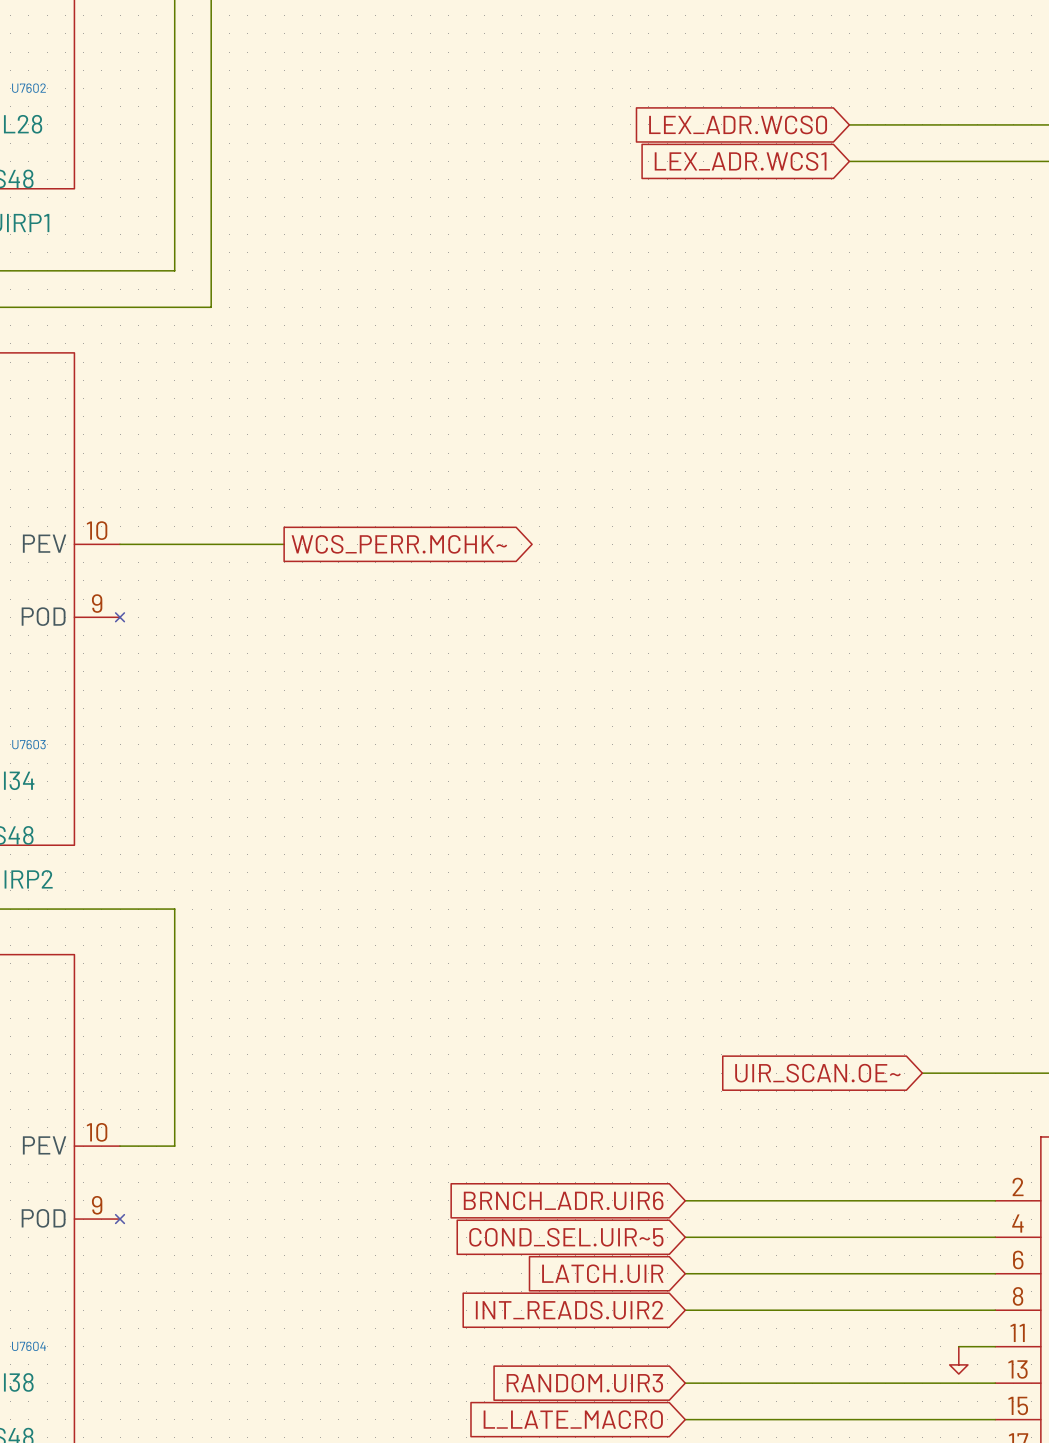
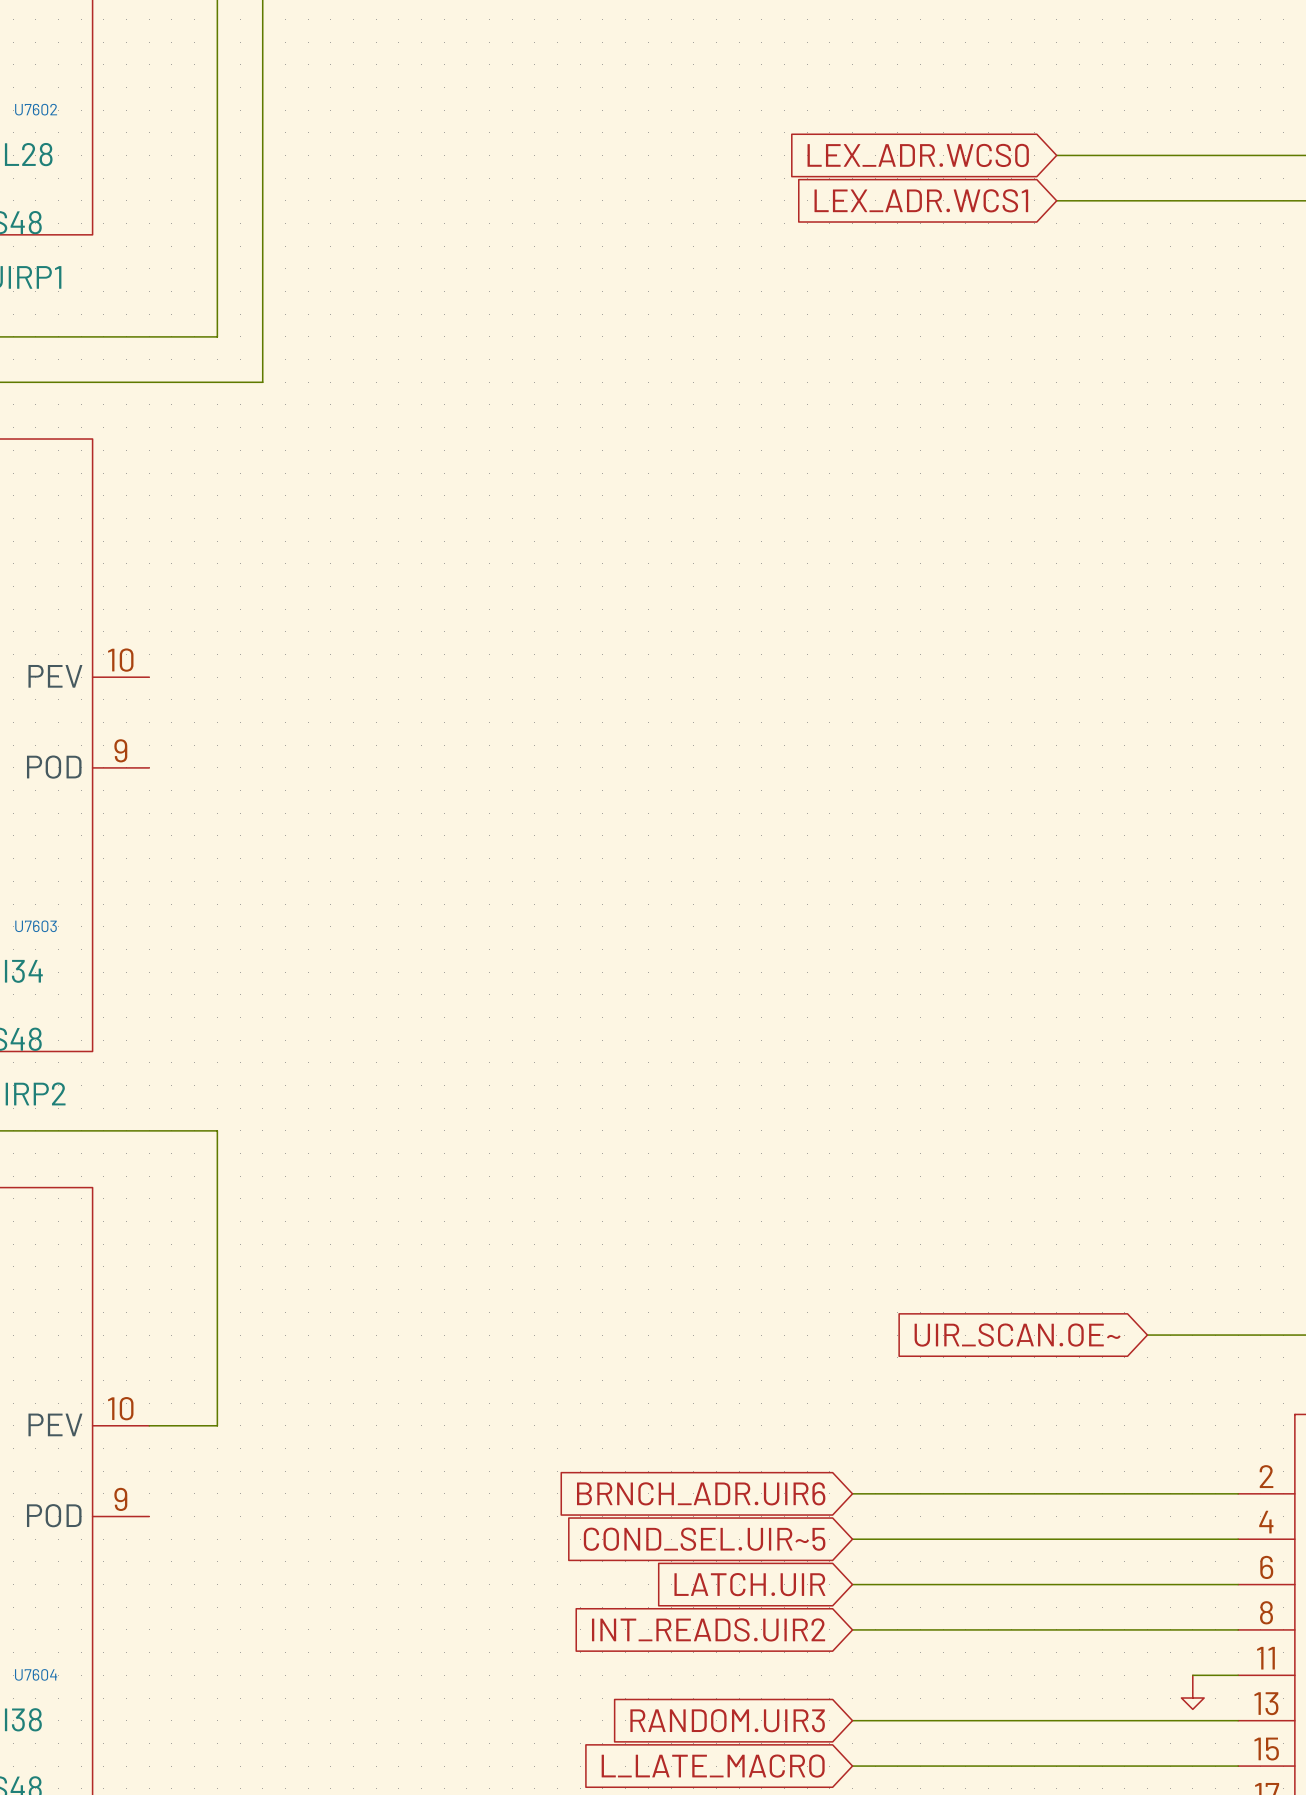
wire: (120, 544) (284, 544) -> none
global label: WCS_PERR.MCHK~ (399, 544) -> none
no-connect mark: (120, 617) -> none
no-connect mark: (120, 1219) -> none

